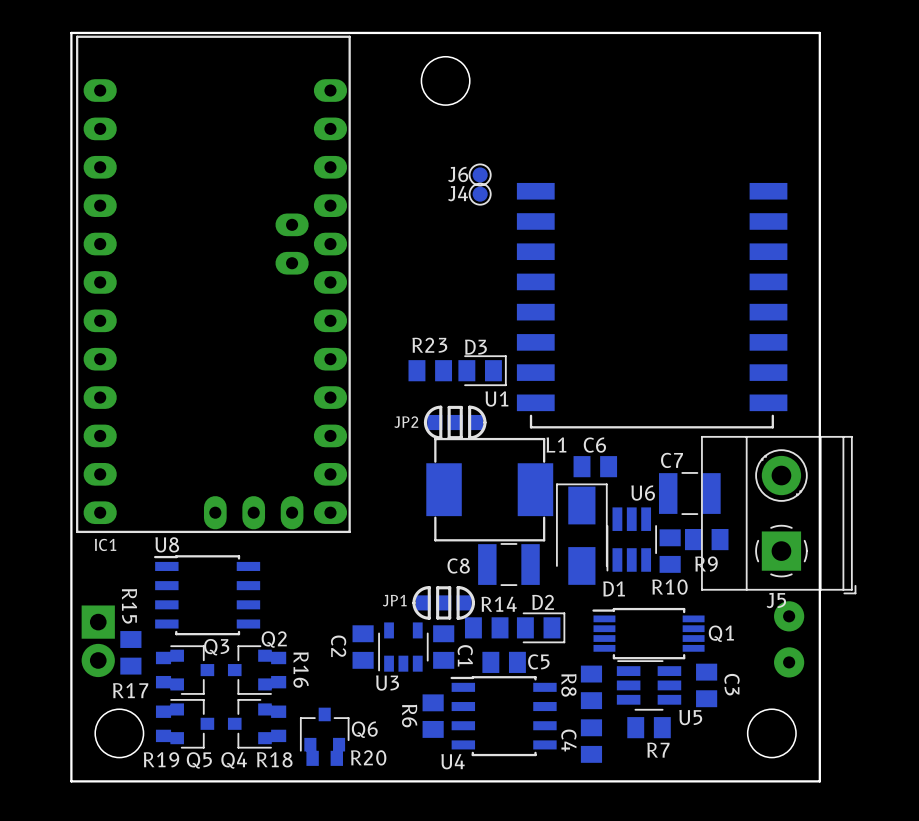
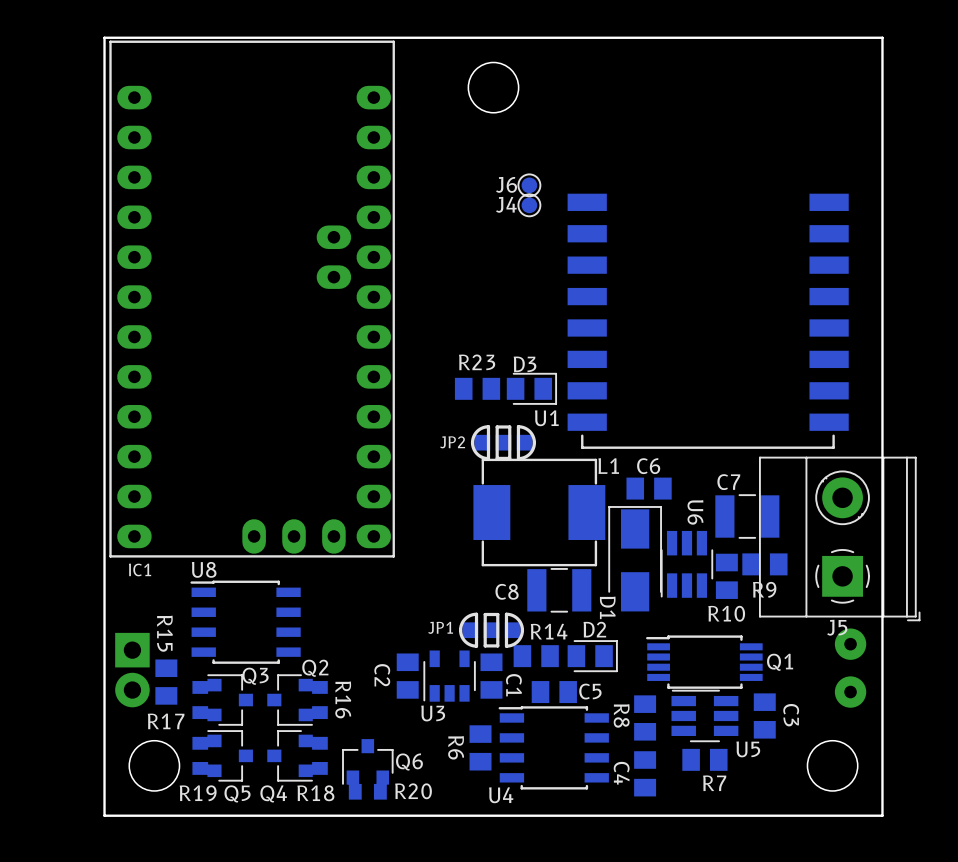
U6 name rotation: 0° (643, 493) -> 90° clockwise (695, 512)
D1 name rotation: 0° (614, 588) -> 90° clockwise (607, 607)
D1 name position: D1 (614, 588) -> D1 (607, 607)

